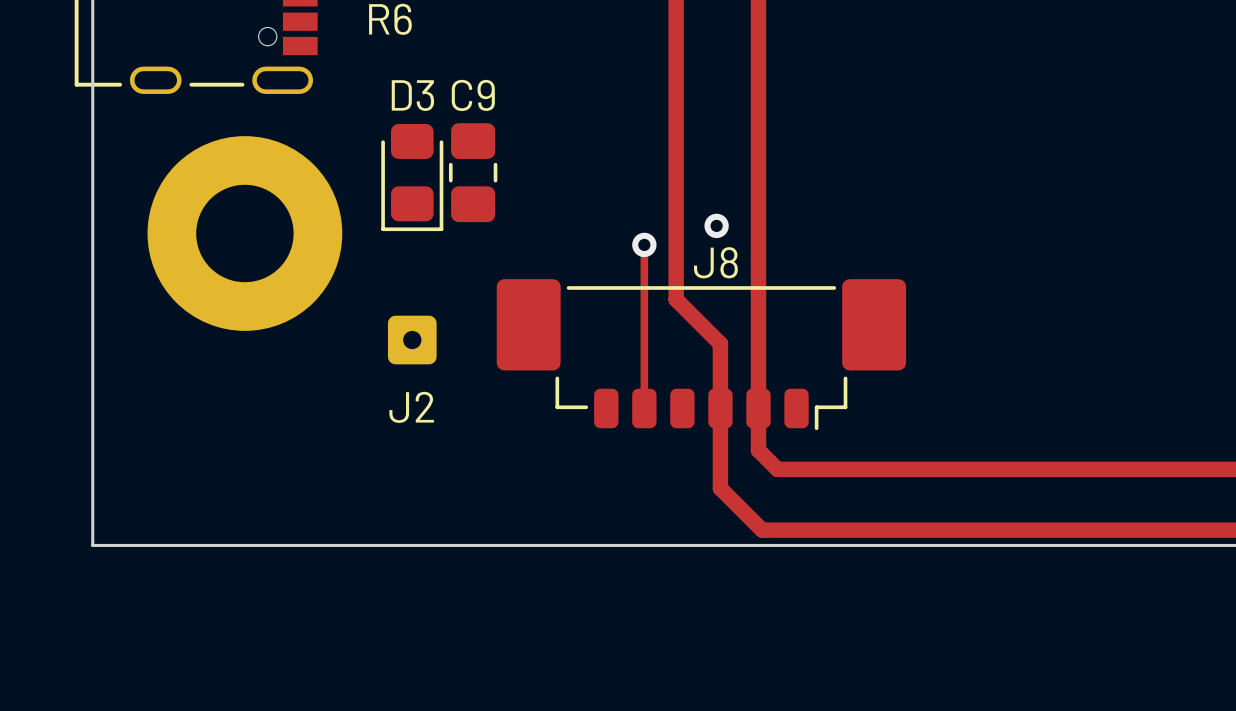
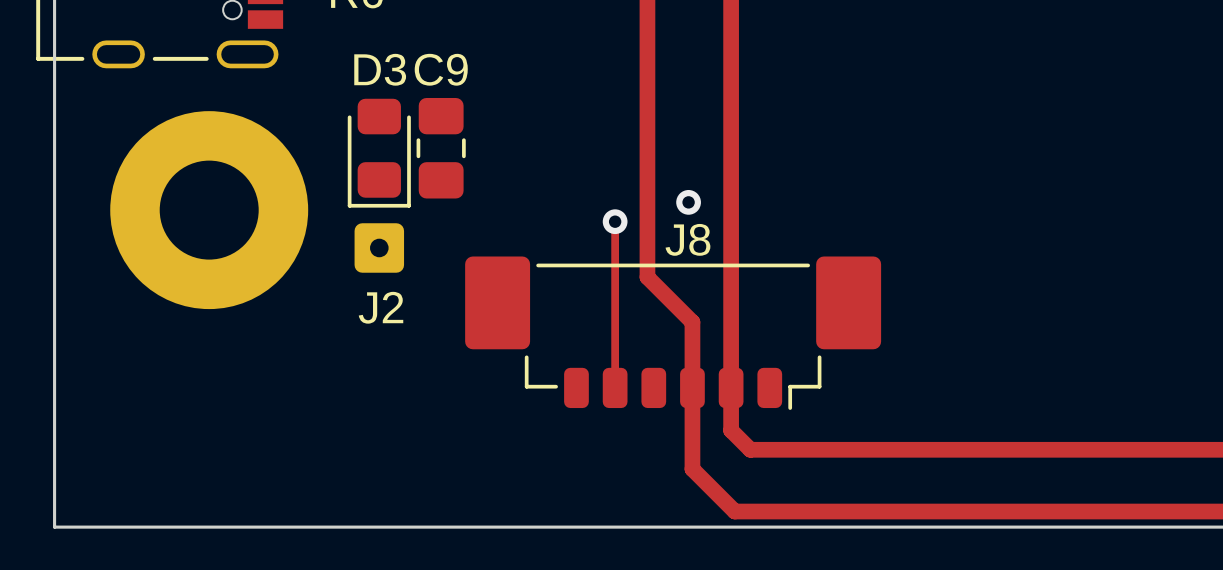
J2 position: (412, 340) -> (379, 247)
J2 name position: J2 (411, 407) -> J2 (381, 307)

